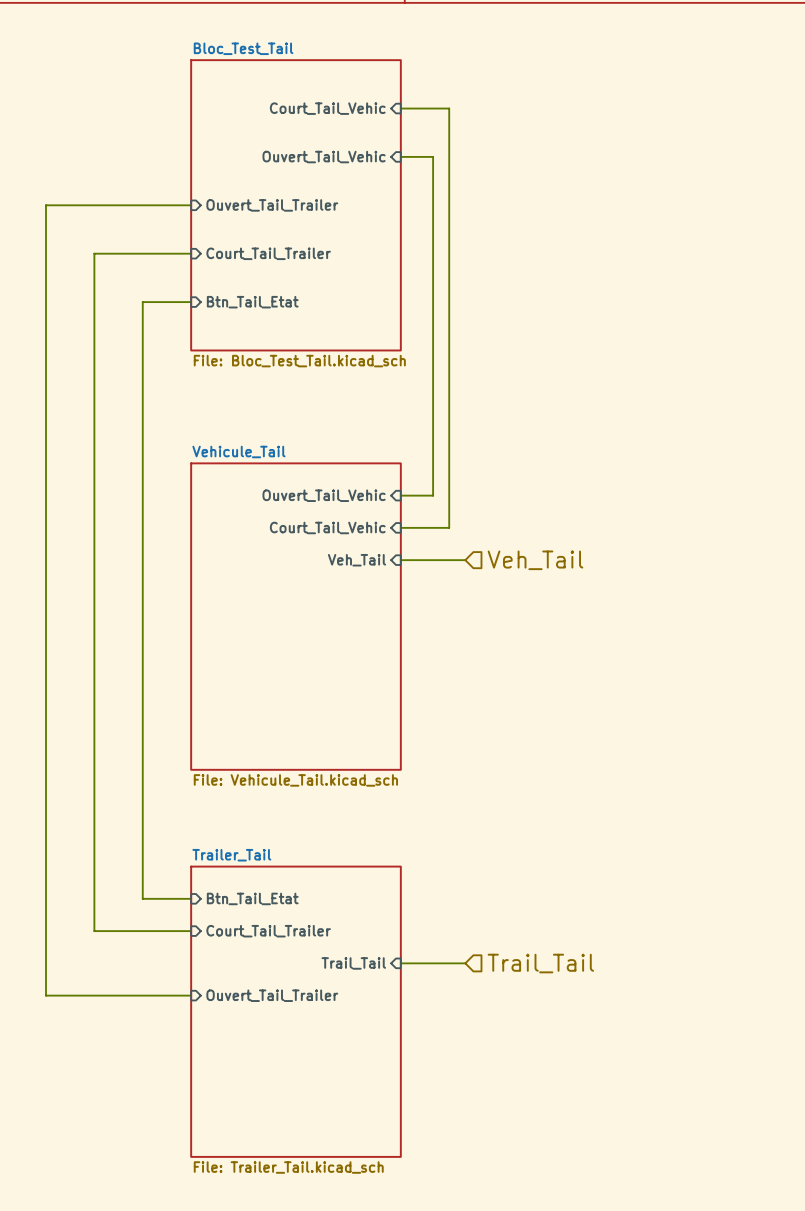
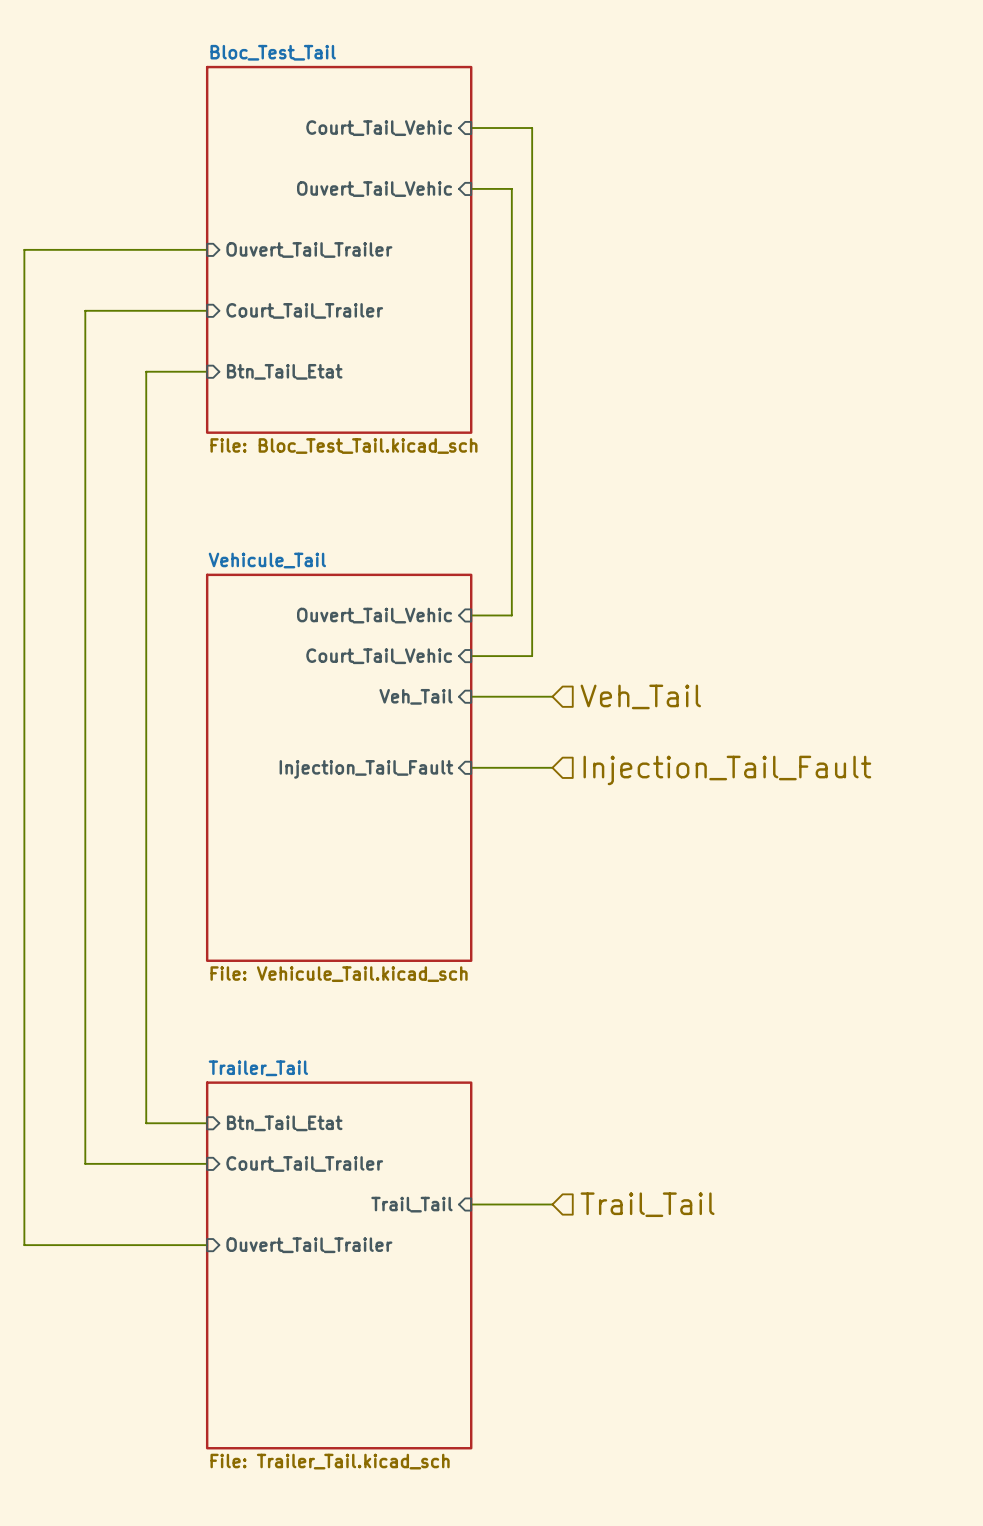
wire: none -> (471, 767) (552, 767)
sheet pin: none -> Injection_Tail_Fault (366, 769)
hierarchical label: none -> Injection_Tail_Fault (727, 770)

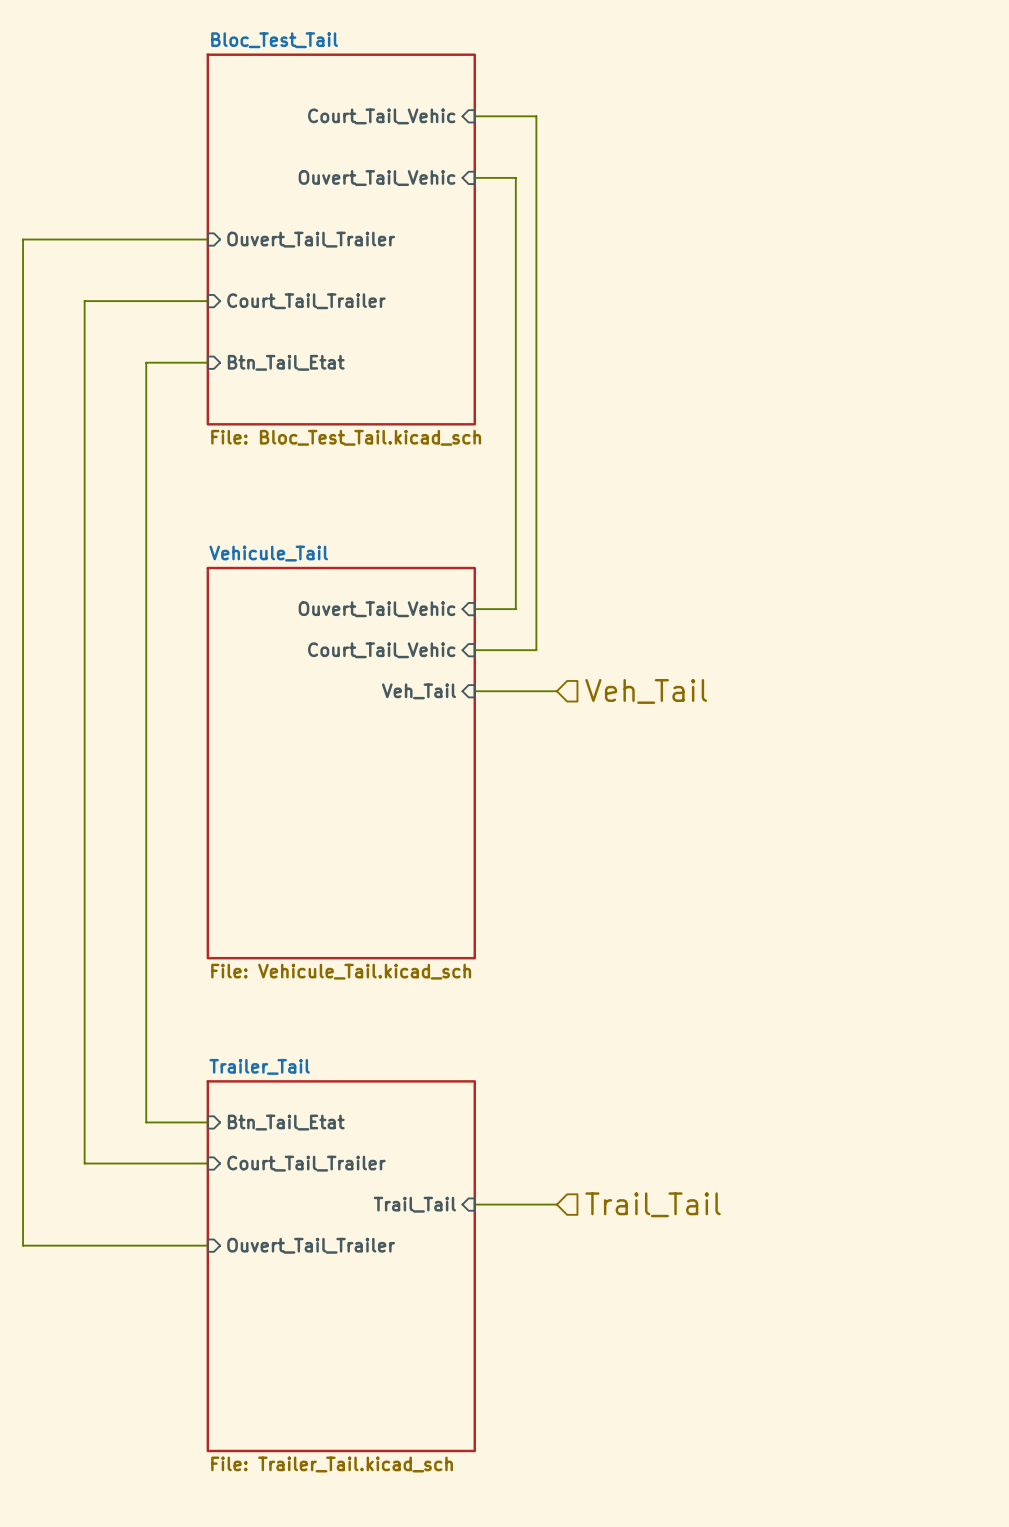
wire: (471, 767) (552, 767) -> none
sheet pin: Injection_Tail_Fault (366, 769) -> none
hierarchical label: Injection_Tail_Fault (727, 770) -> none

